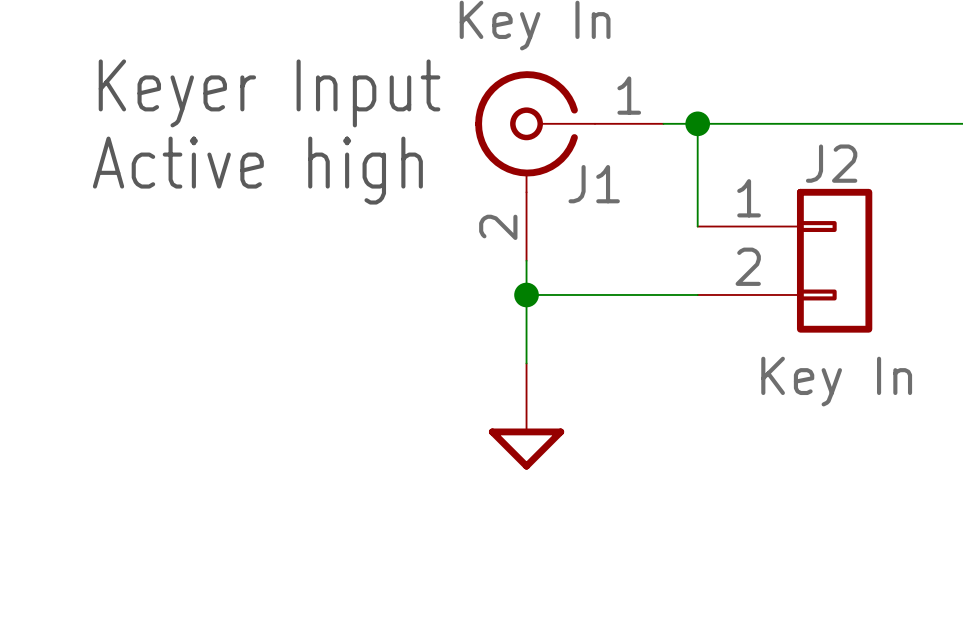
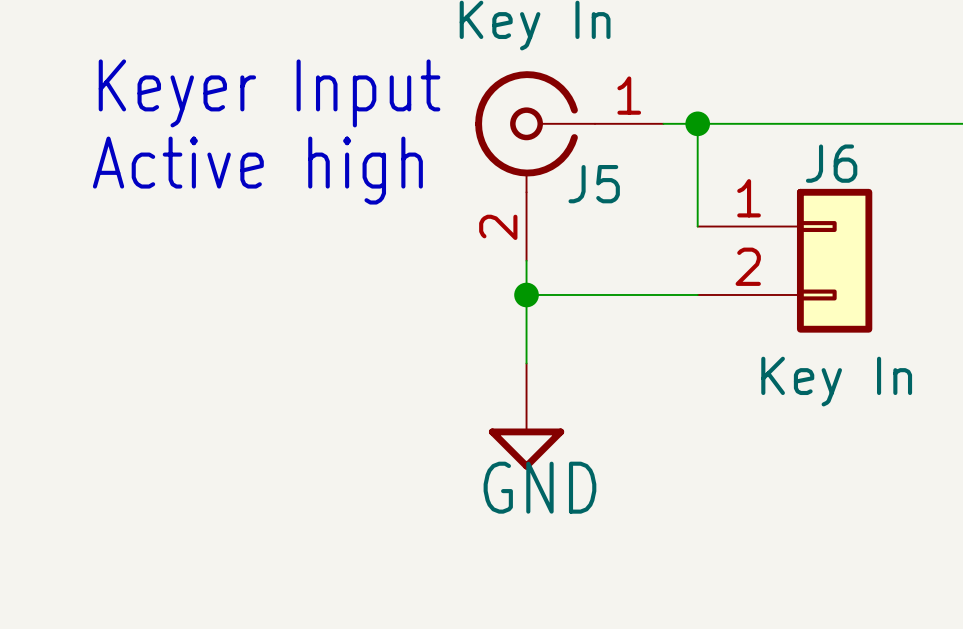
J2 name: J2 (831, 163) -> J6 (831, 163)
J1 name: J1 (594, 184) -> J5 (594, 184)
power symbol text: none -> GND (539, 487)

